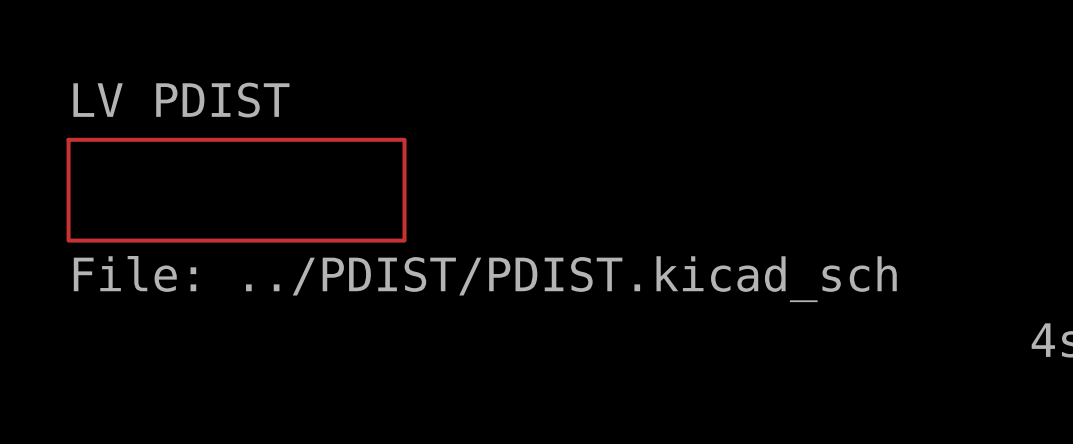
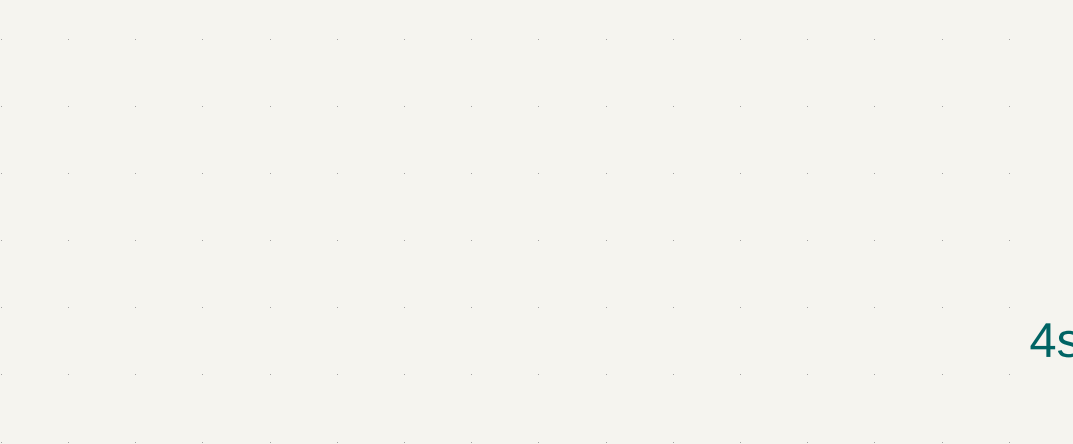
sheet LV PDIST: File: ../PDIST/PDIST.kicad_sch (236, 190) -> none

